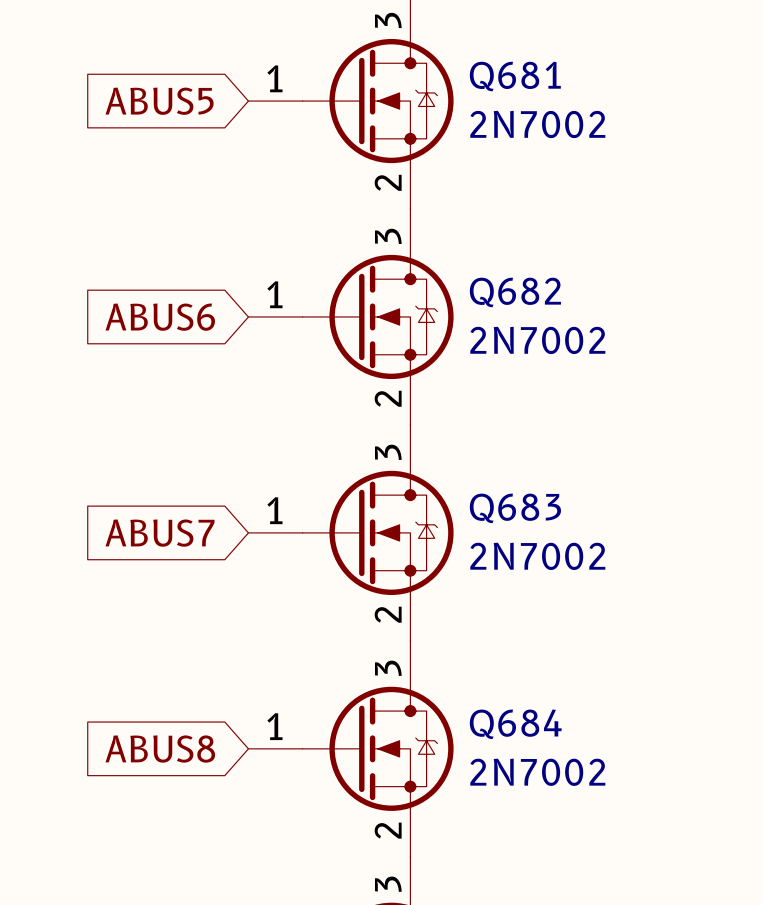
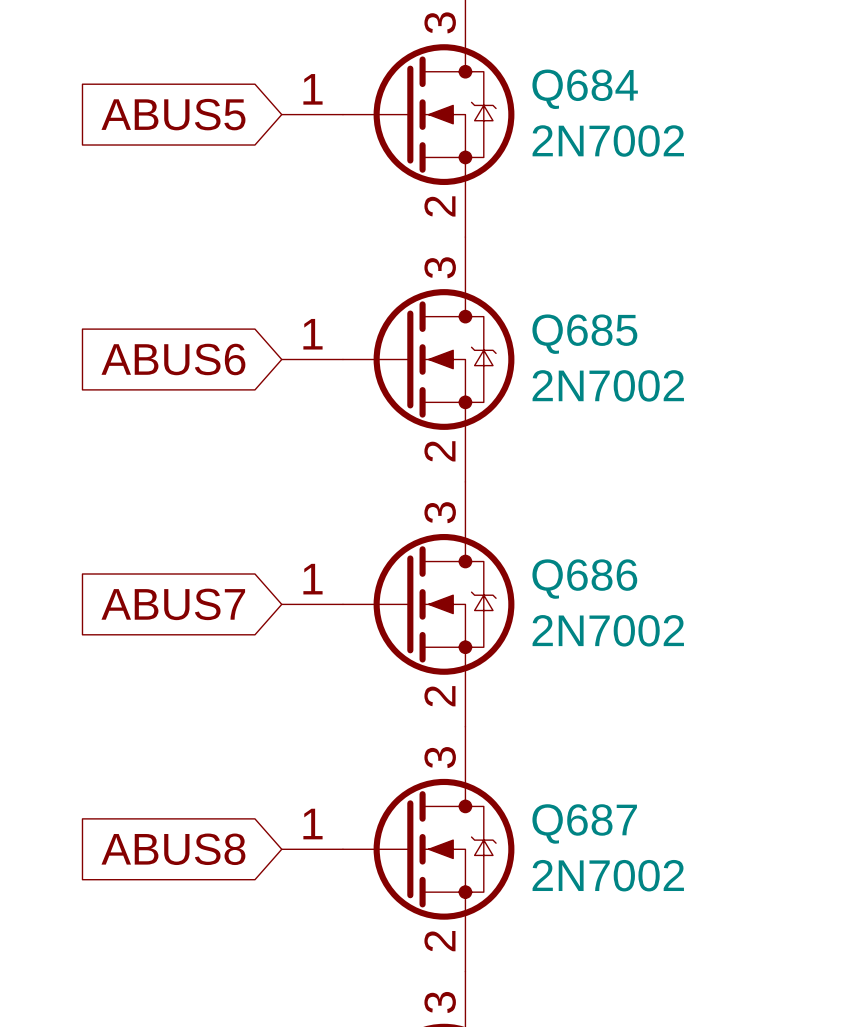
Q681 name: Q681 (515, 76) -> Q684 (585, 89)
Q682 name: Q682 (515, 292) -> Q685 (584, 334)
Q683 name: Q683 (515, 508) -> Q686 (584, 579)
Q684 name: Q684 (515, 724) -> Q687 (584, 823)

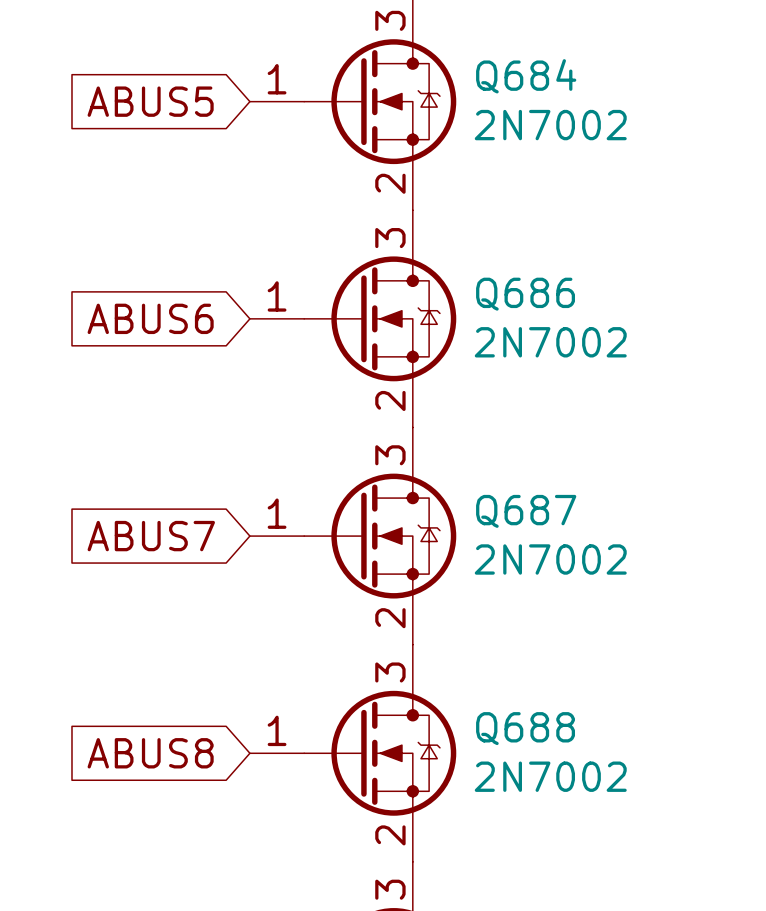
Q685 name: Q685 (584, 334) -> Q686 (525, 294)
Q686 name: Q686 (584, 579) -> Q687 (526, 511)
Q687 name: Q687 (584, 823) -> Q688 (525, 728)

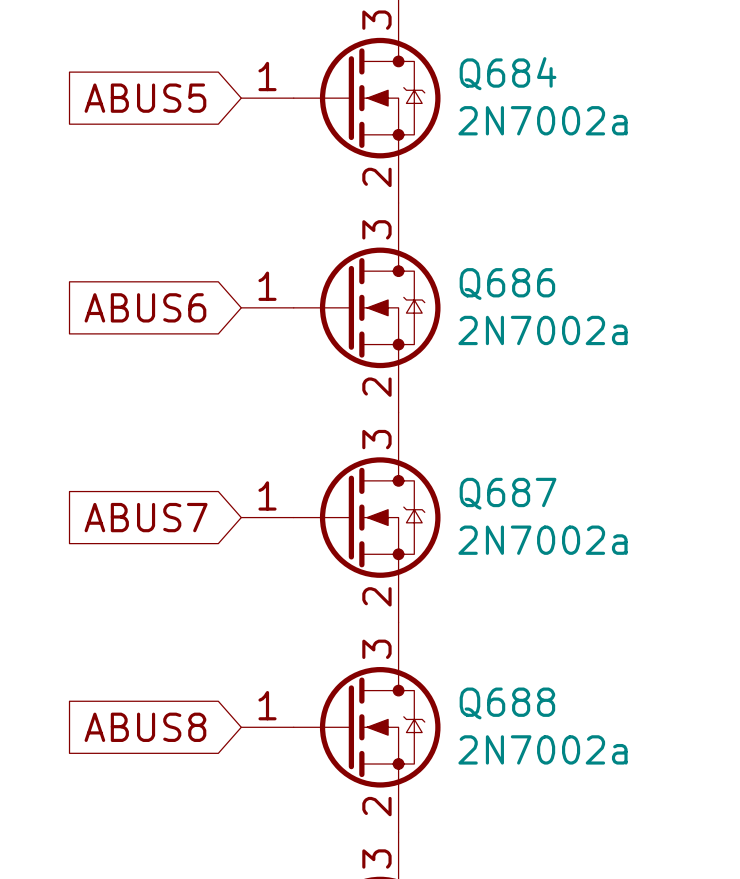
Q684 value: 2N7002 (550, 125) -> 2N7002a (542, 120)
Q686 value: 2N7002 (550, 342) -> 2N7002a (542, 330)
Q687 value: 2N7002 (550, 559) -> 2N7002a (542, 540)
Q688 value: 2N7002 (550, 776) -> 2N7002a (542, 749)

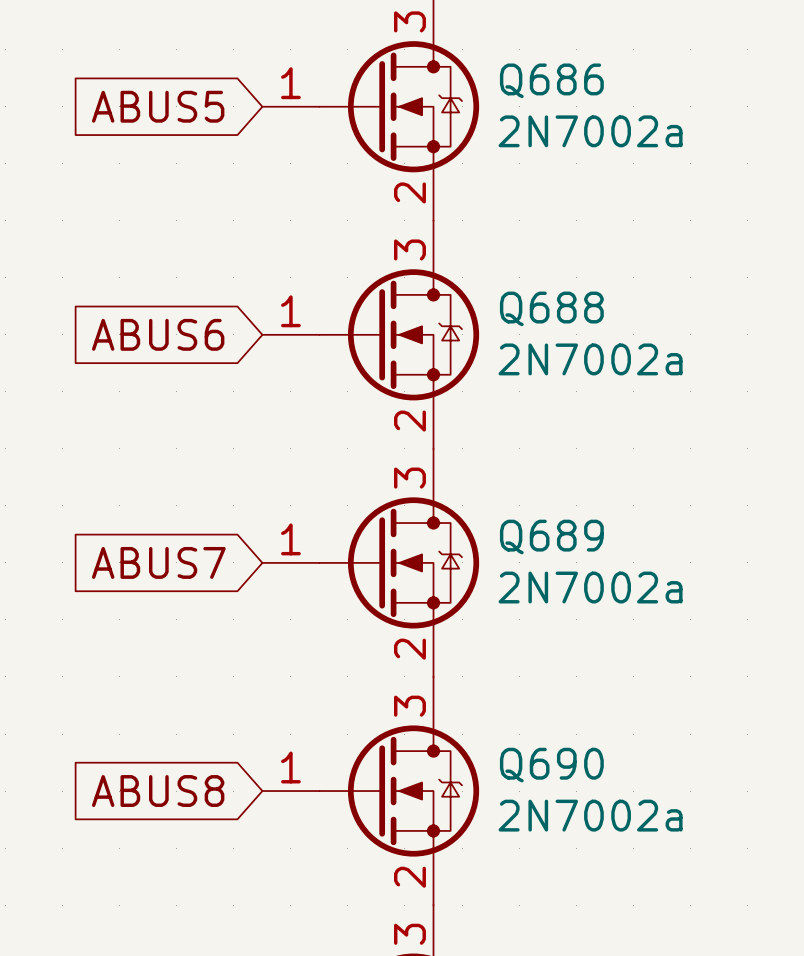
Q684 name: Q684 (508, 73) -> Q686 (551, 80)
Q686 name: Q686 (507, 284) -> Q688 (551, 308)
Q687 name: Q687 (508, 493) -> Q689 (551, 536)
Q688 name: Q688 (507, 703) -> Q690 (551, 765)

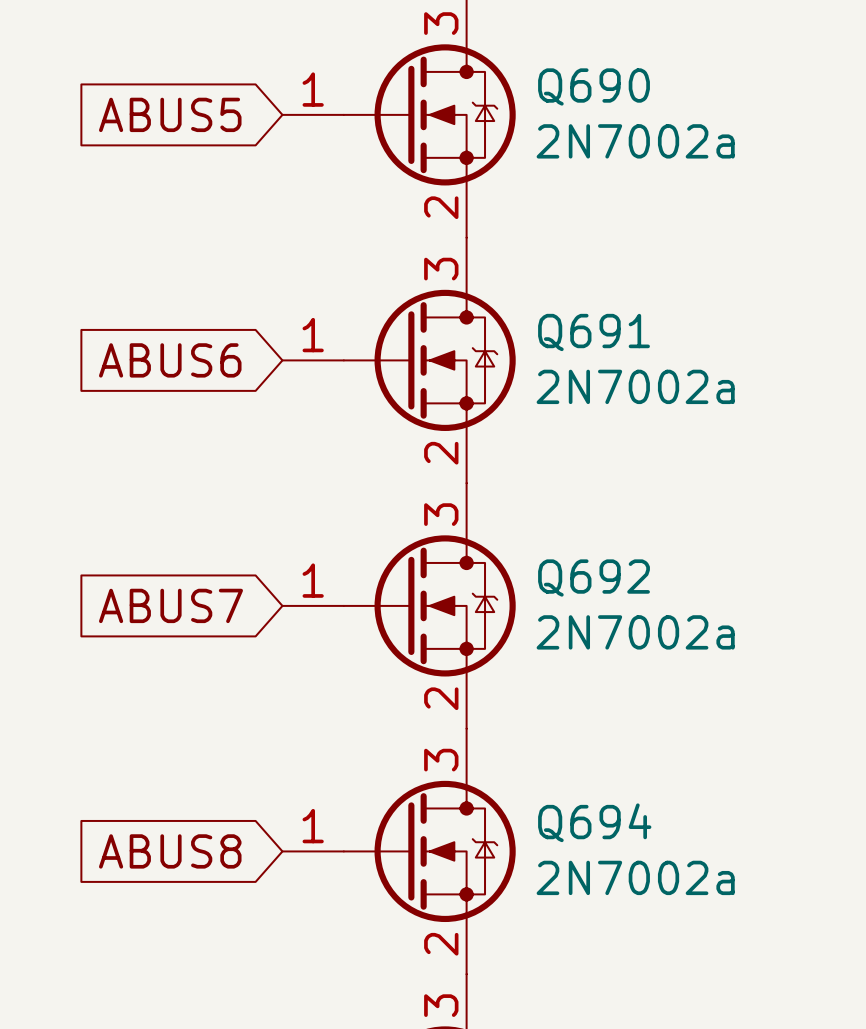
Q686 name: Q686 (551, 80) -> Q690 (594, 86)
Q688 name: Q688 (551, 308) -> Q691 (594, 332)
Q689 name: Q689 (551, 536) -> Q692 (594, 578)
Q690 name: Q690 (551, 765) -> Q694 (594, 822)

